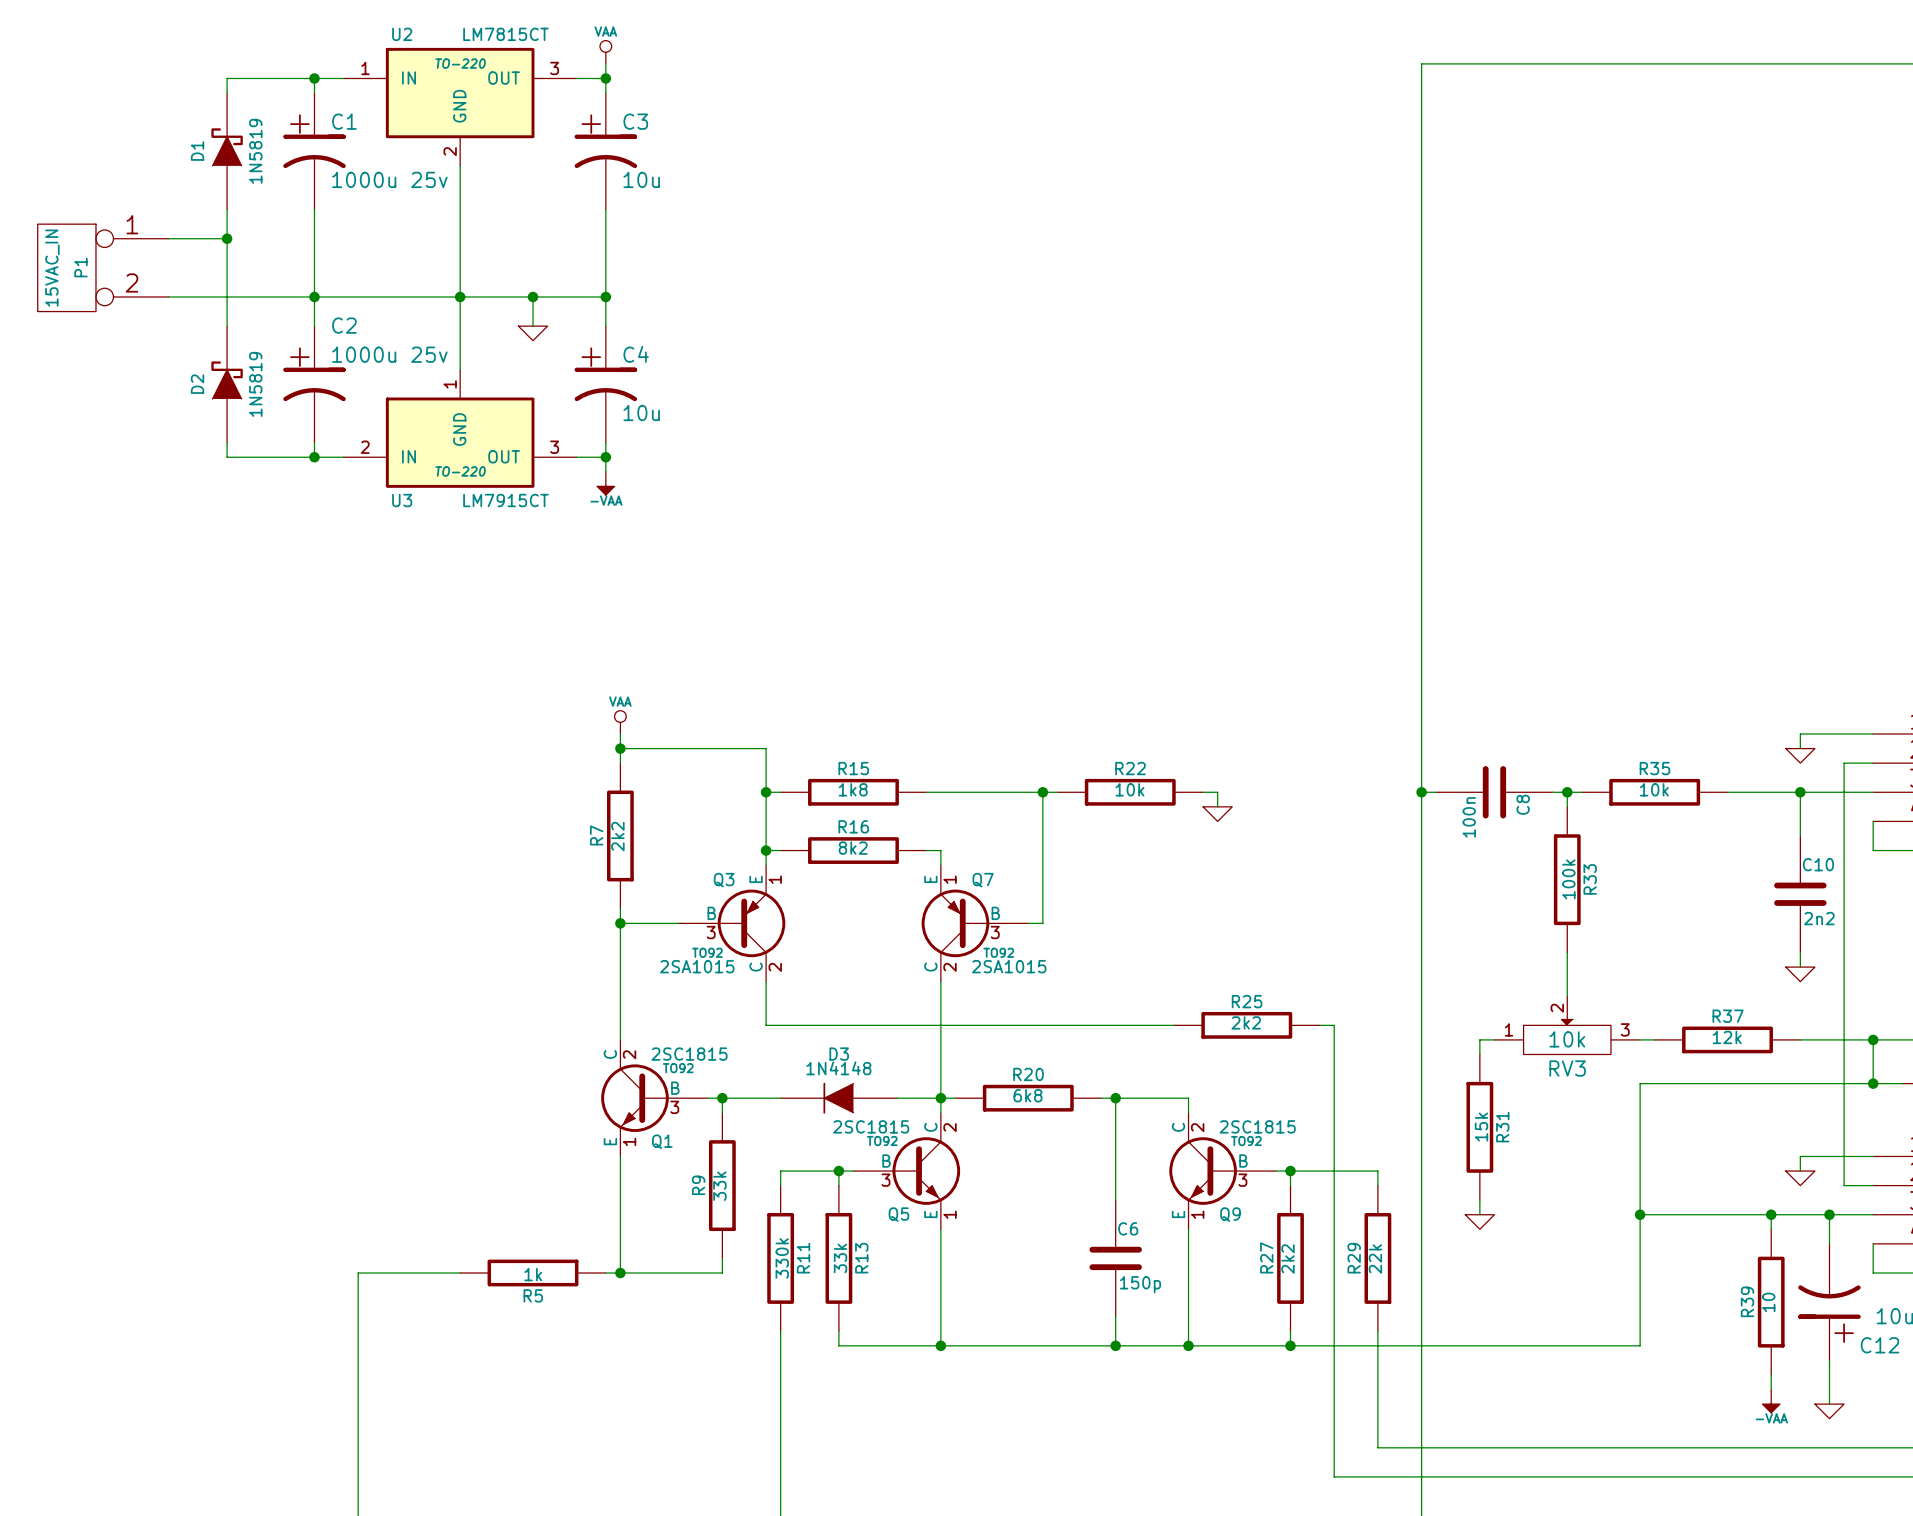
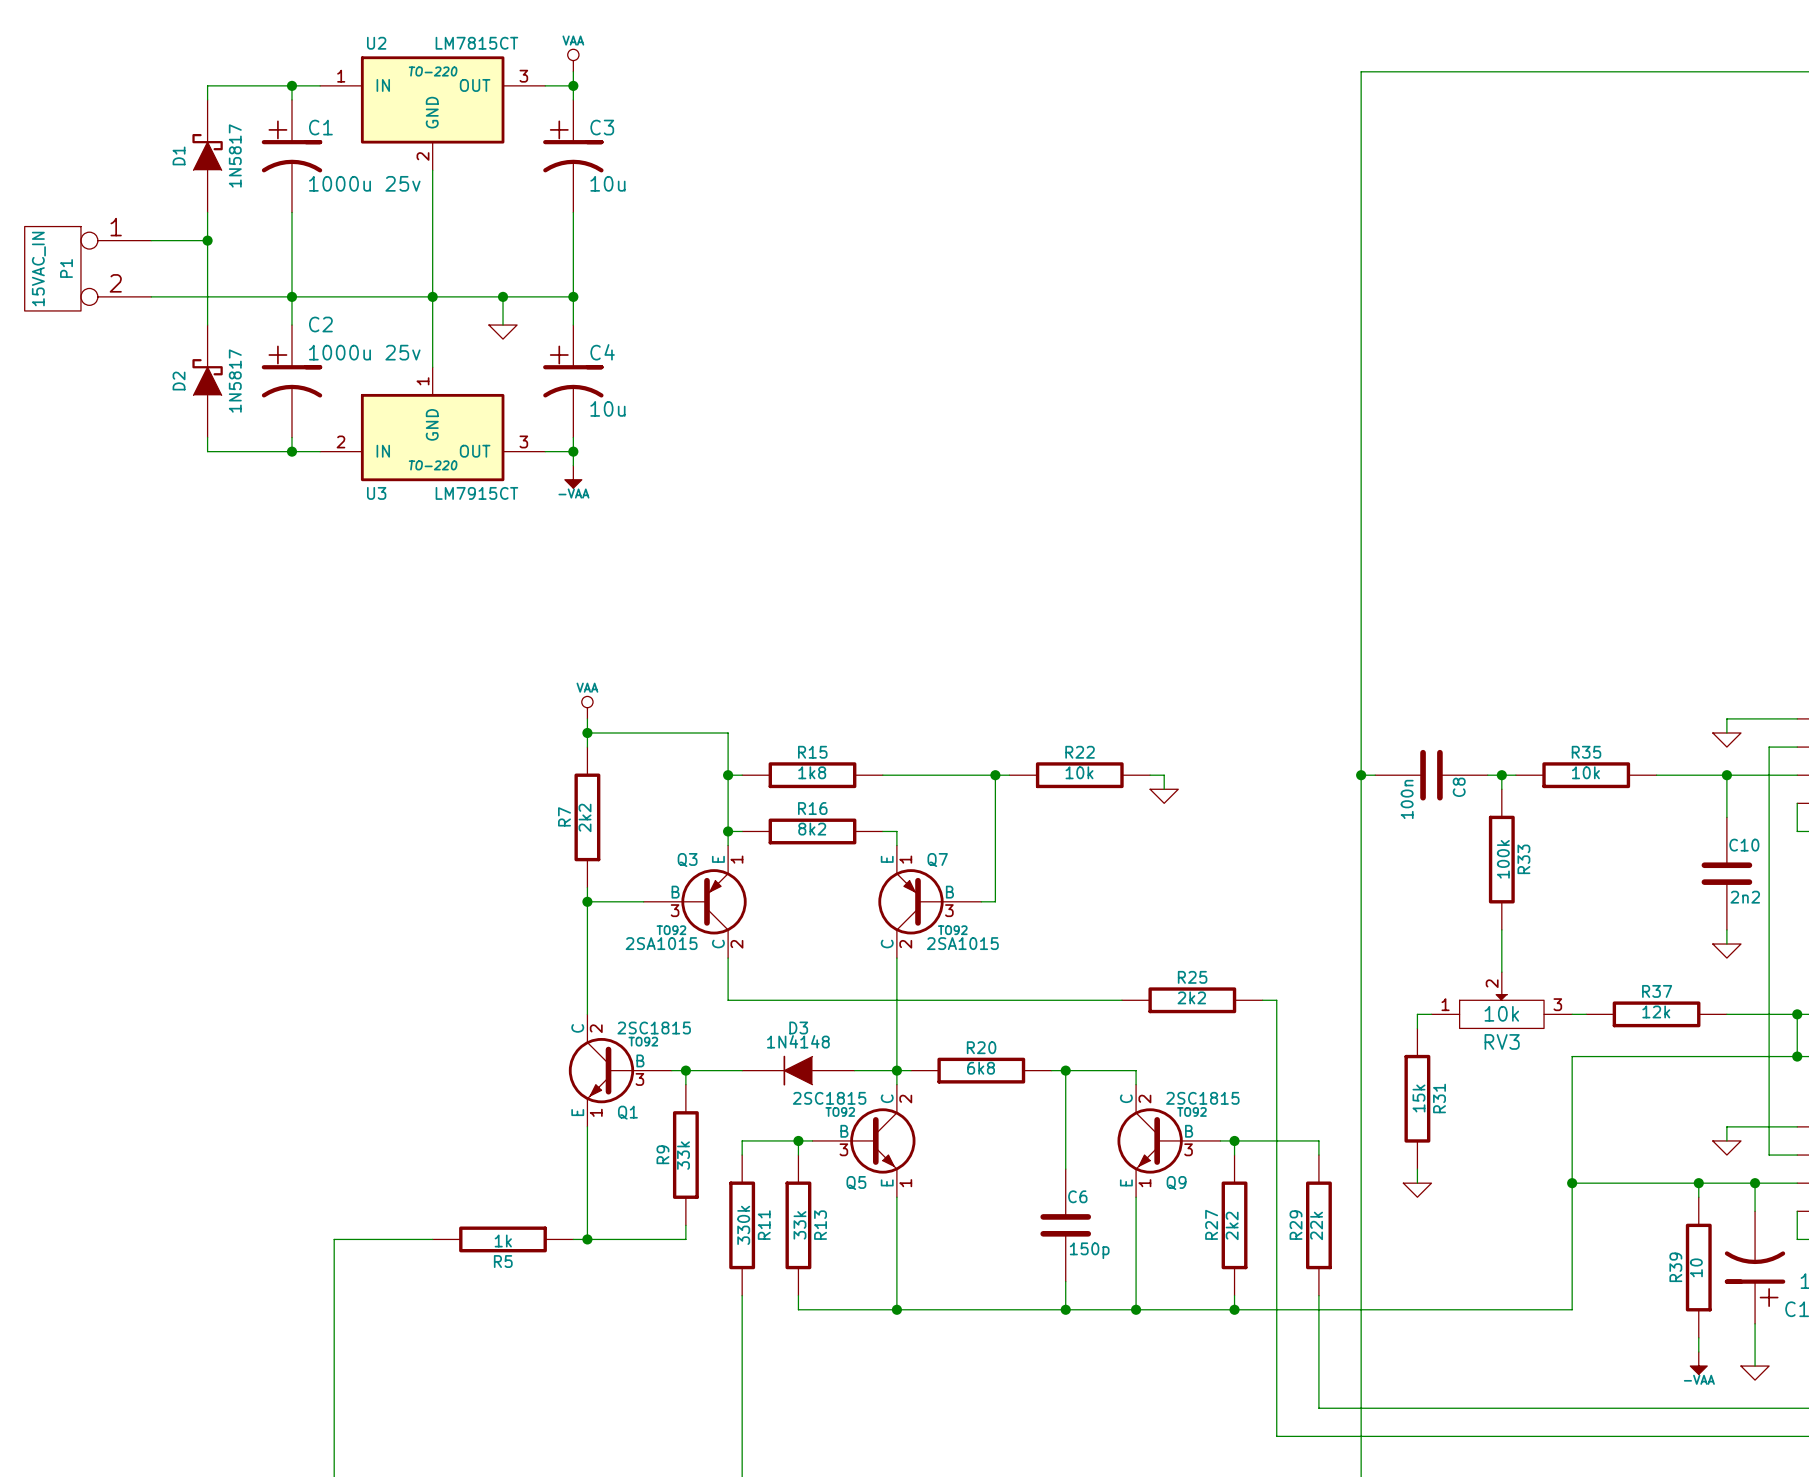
D1 value: 1N5819 (255, 151) -> 1N5817 (235, 155)
D2 value: 1N5819 (255, 384) -> 1N5817 (235, 381)

